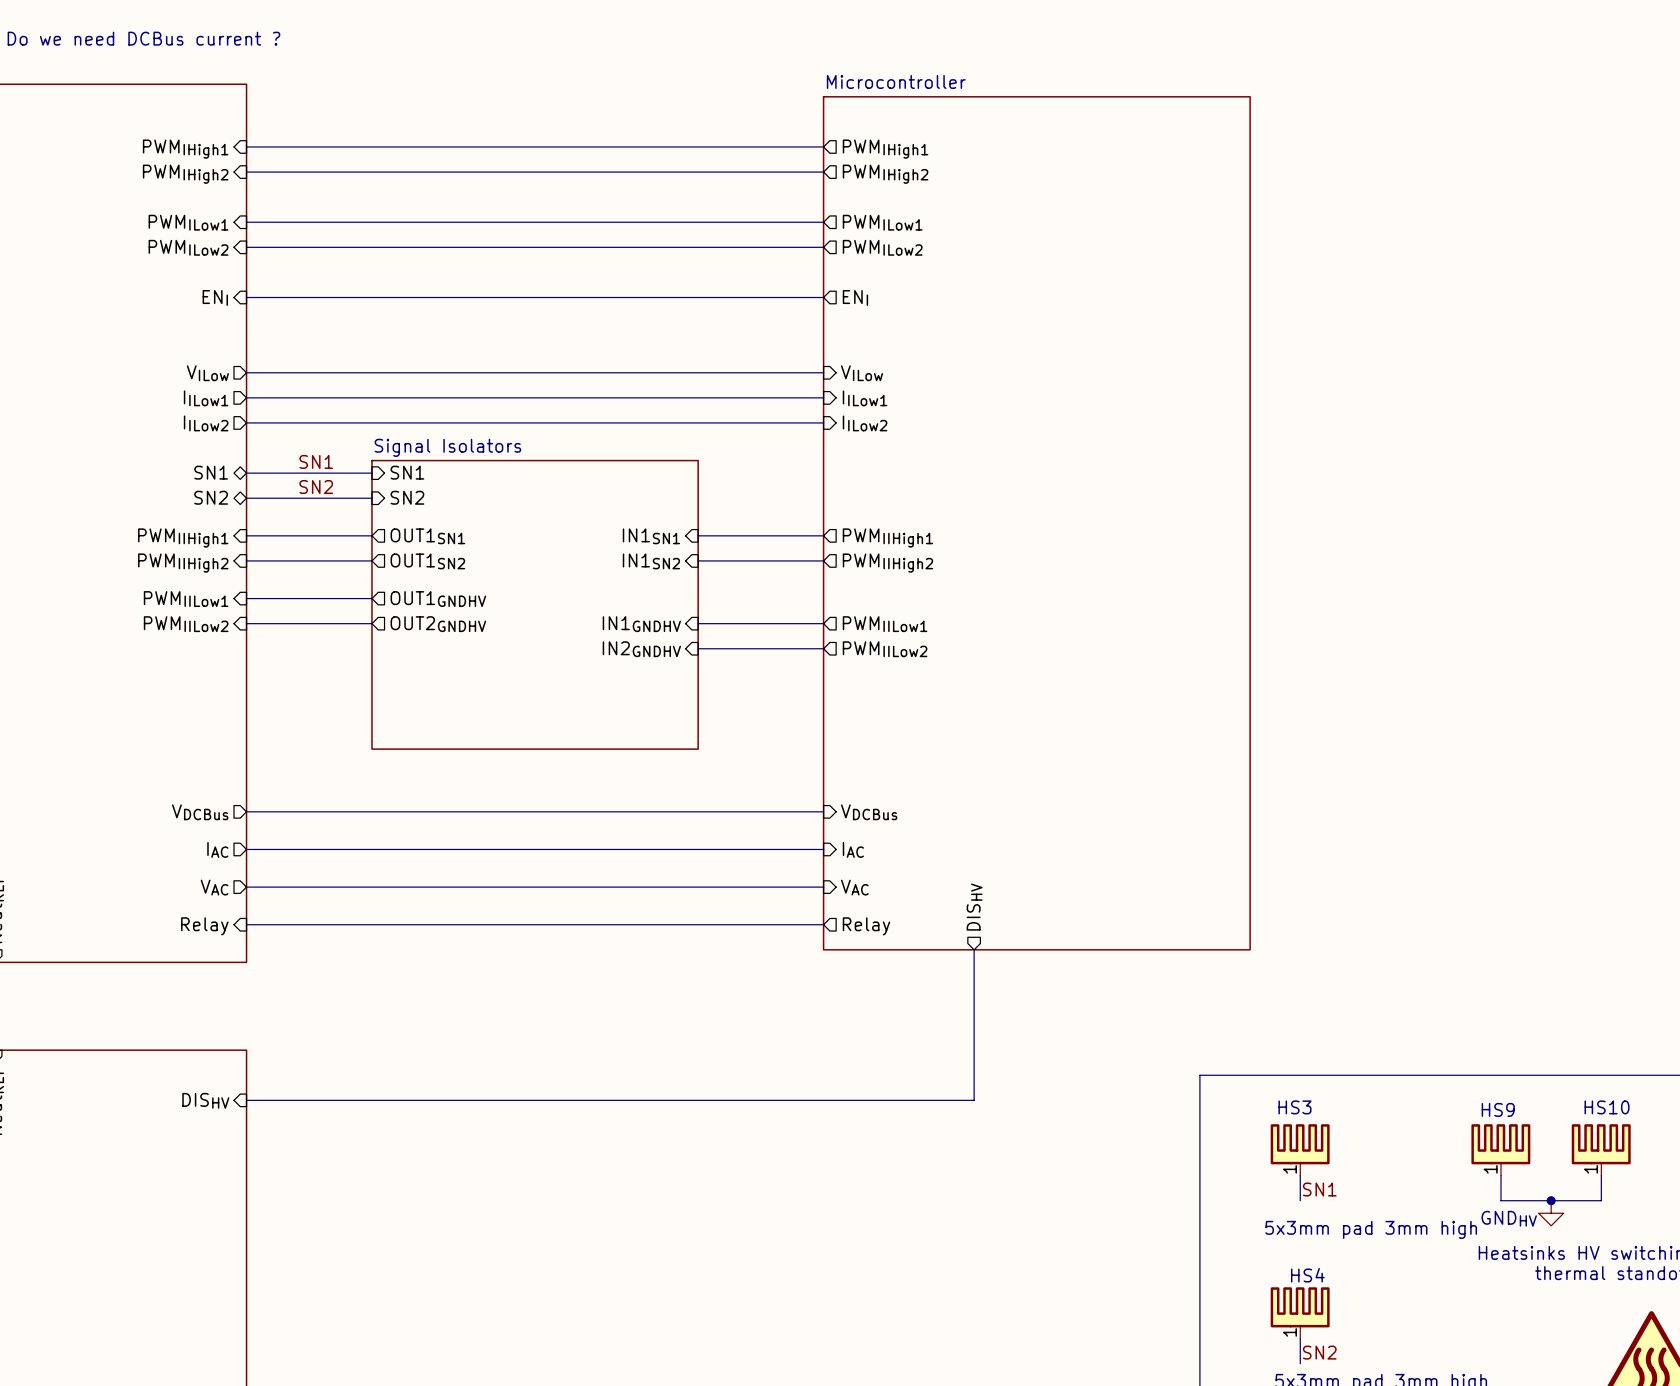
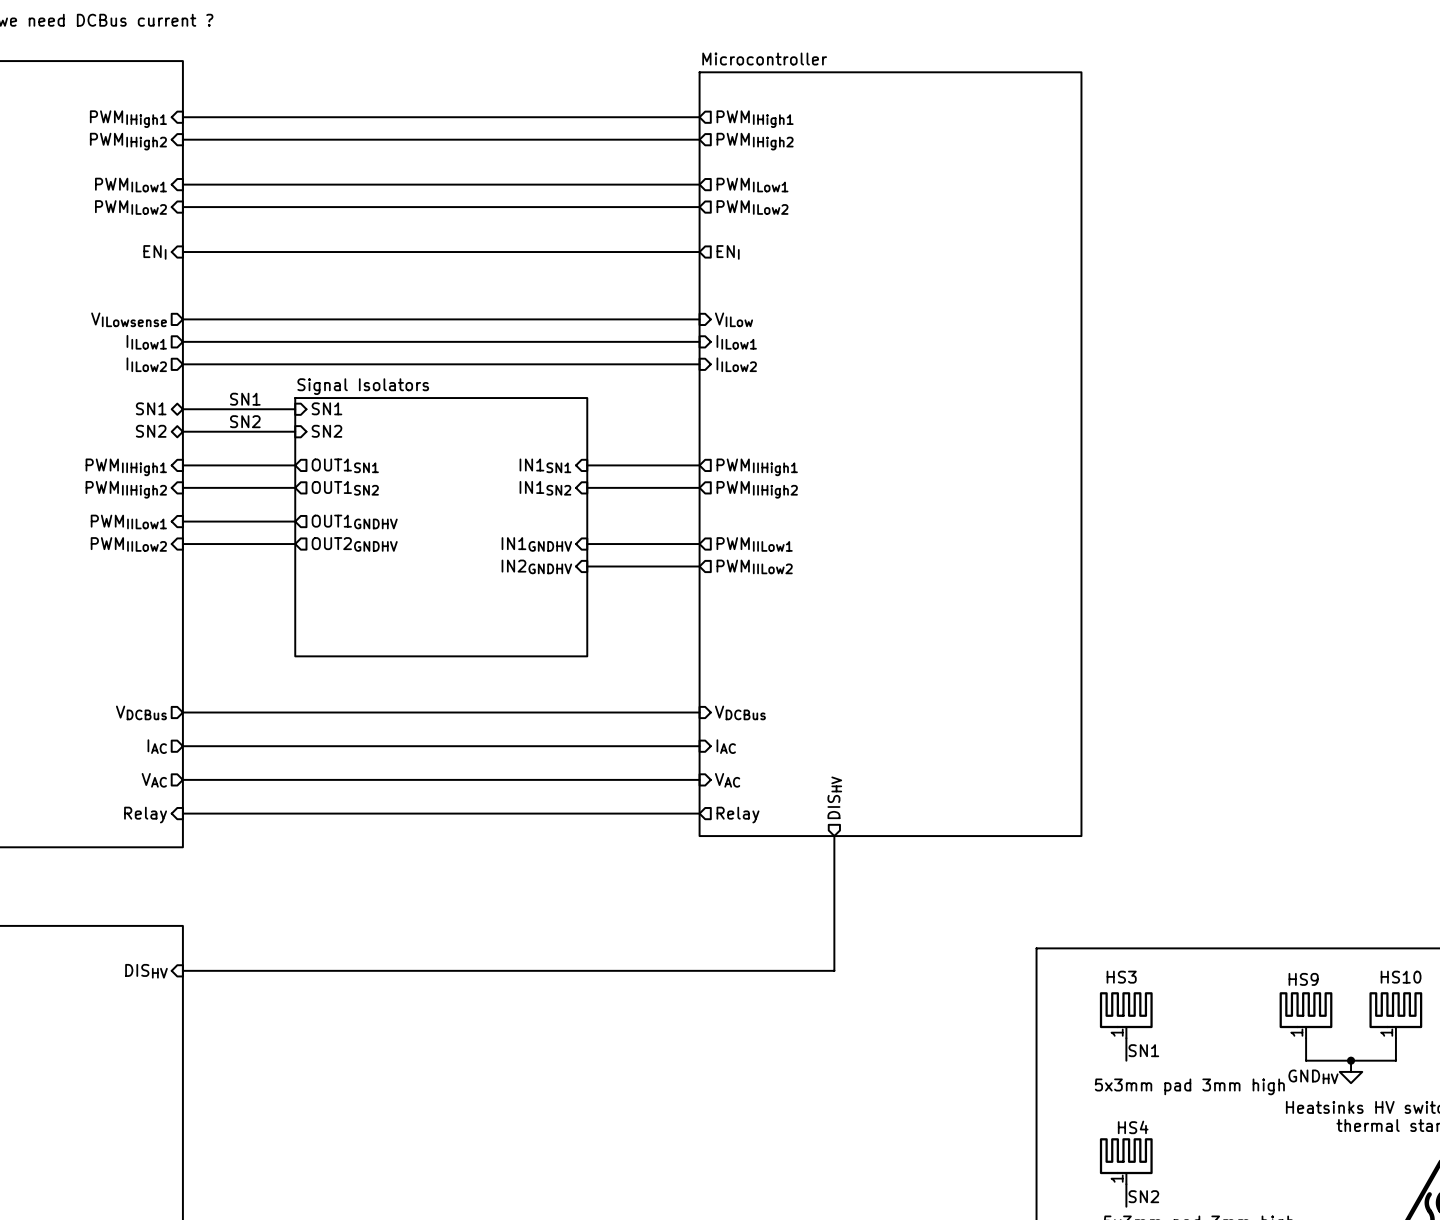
sheet pin: VILow (207, 373) -> VILowsense (129, 319)

